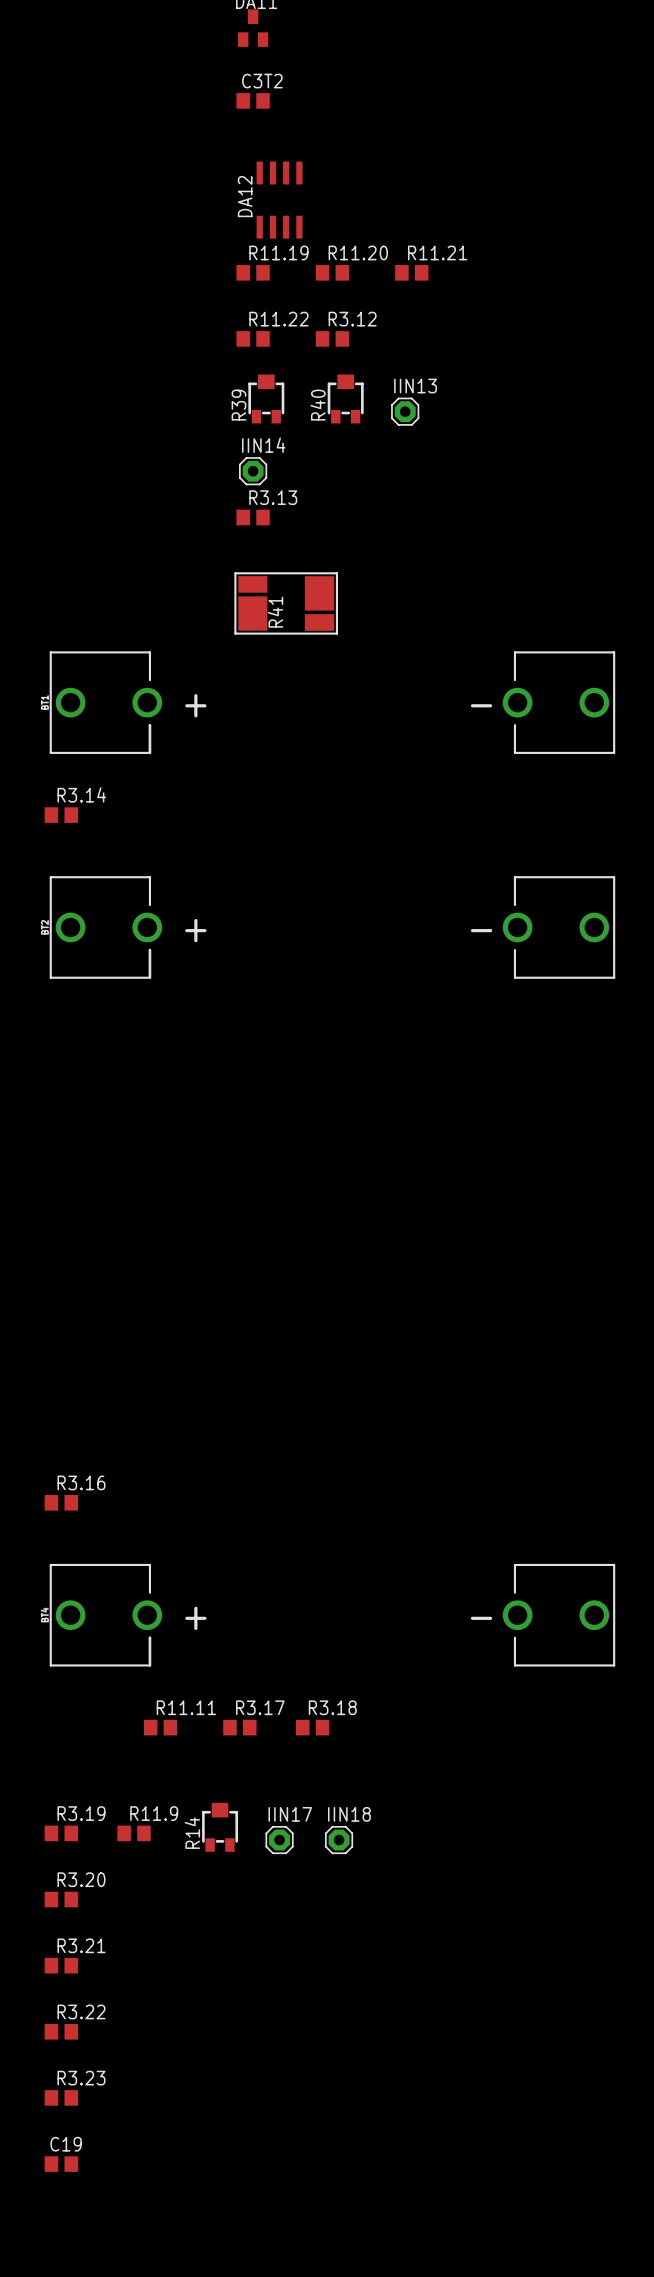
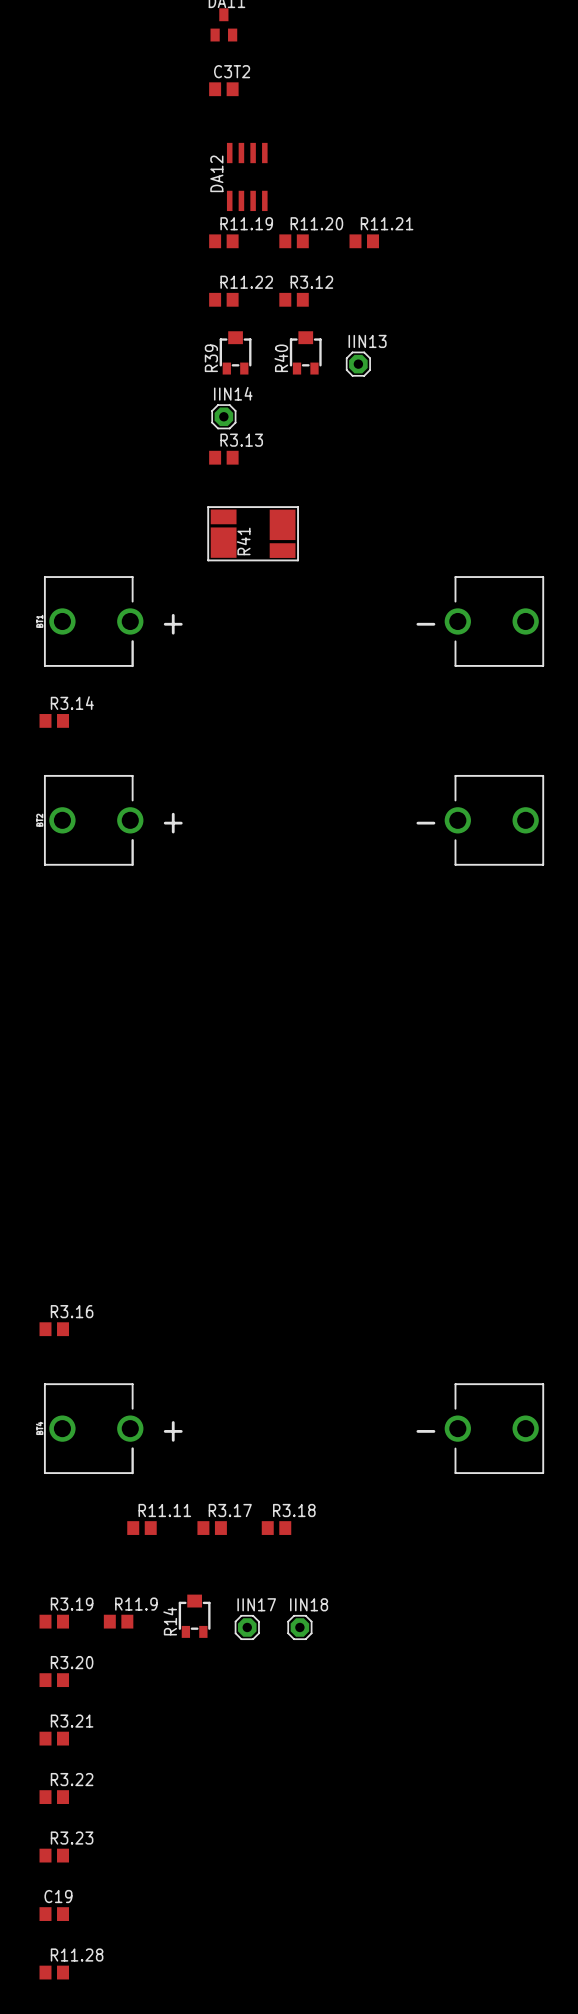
R11.28: none -> (54, 1972)

